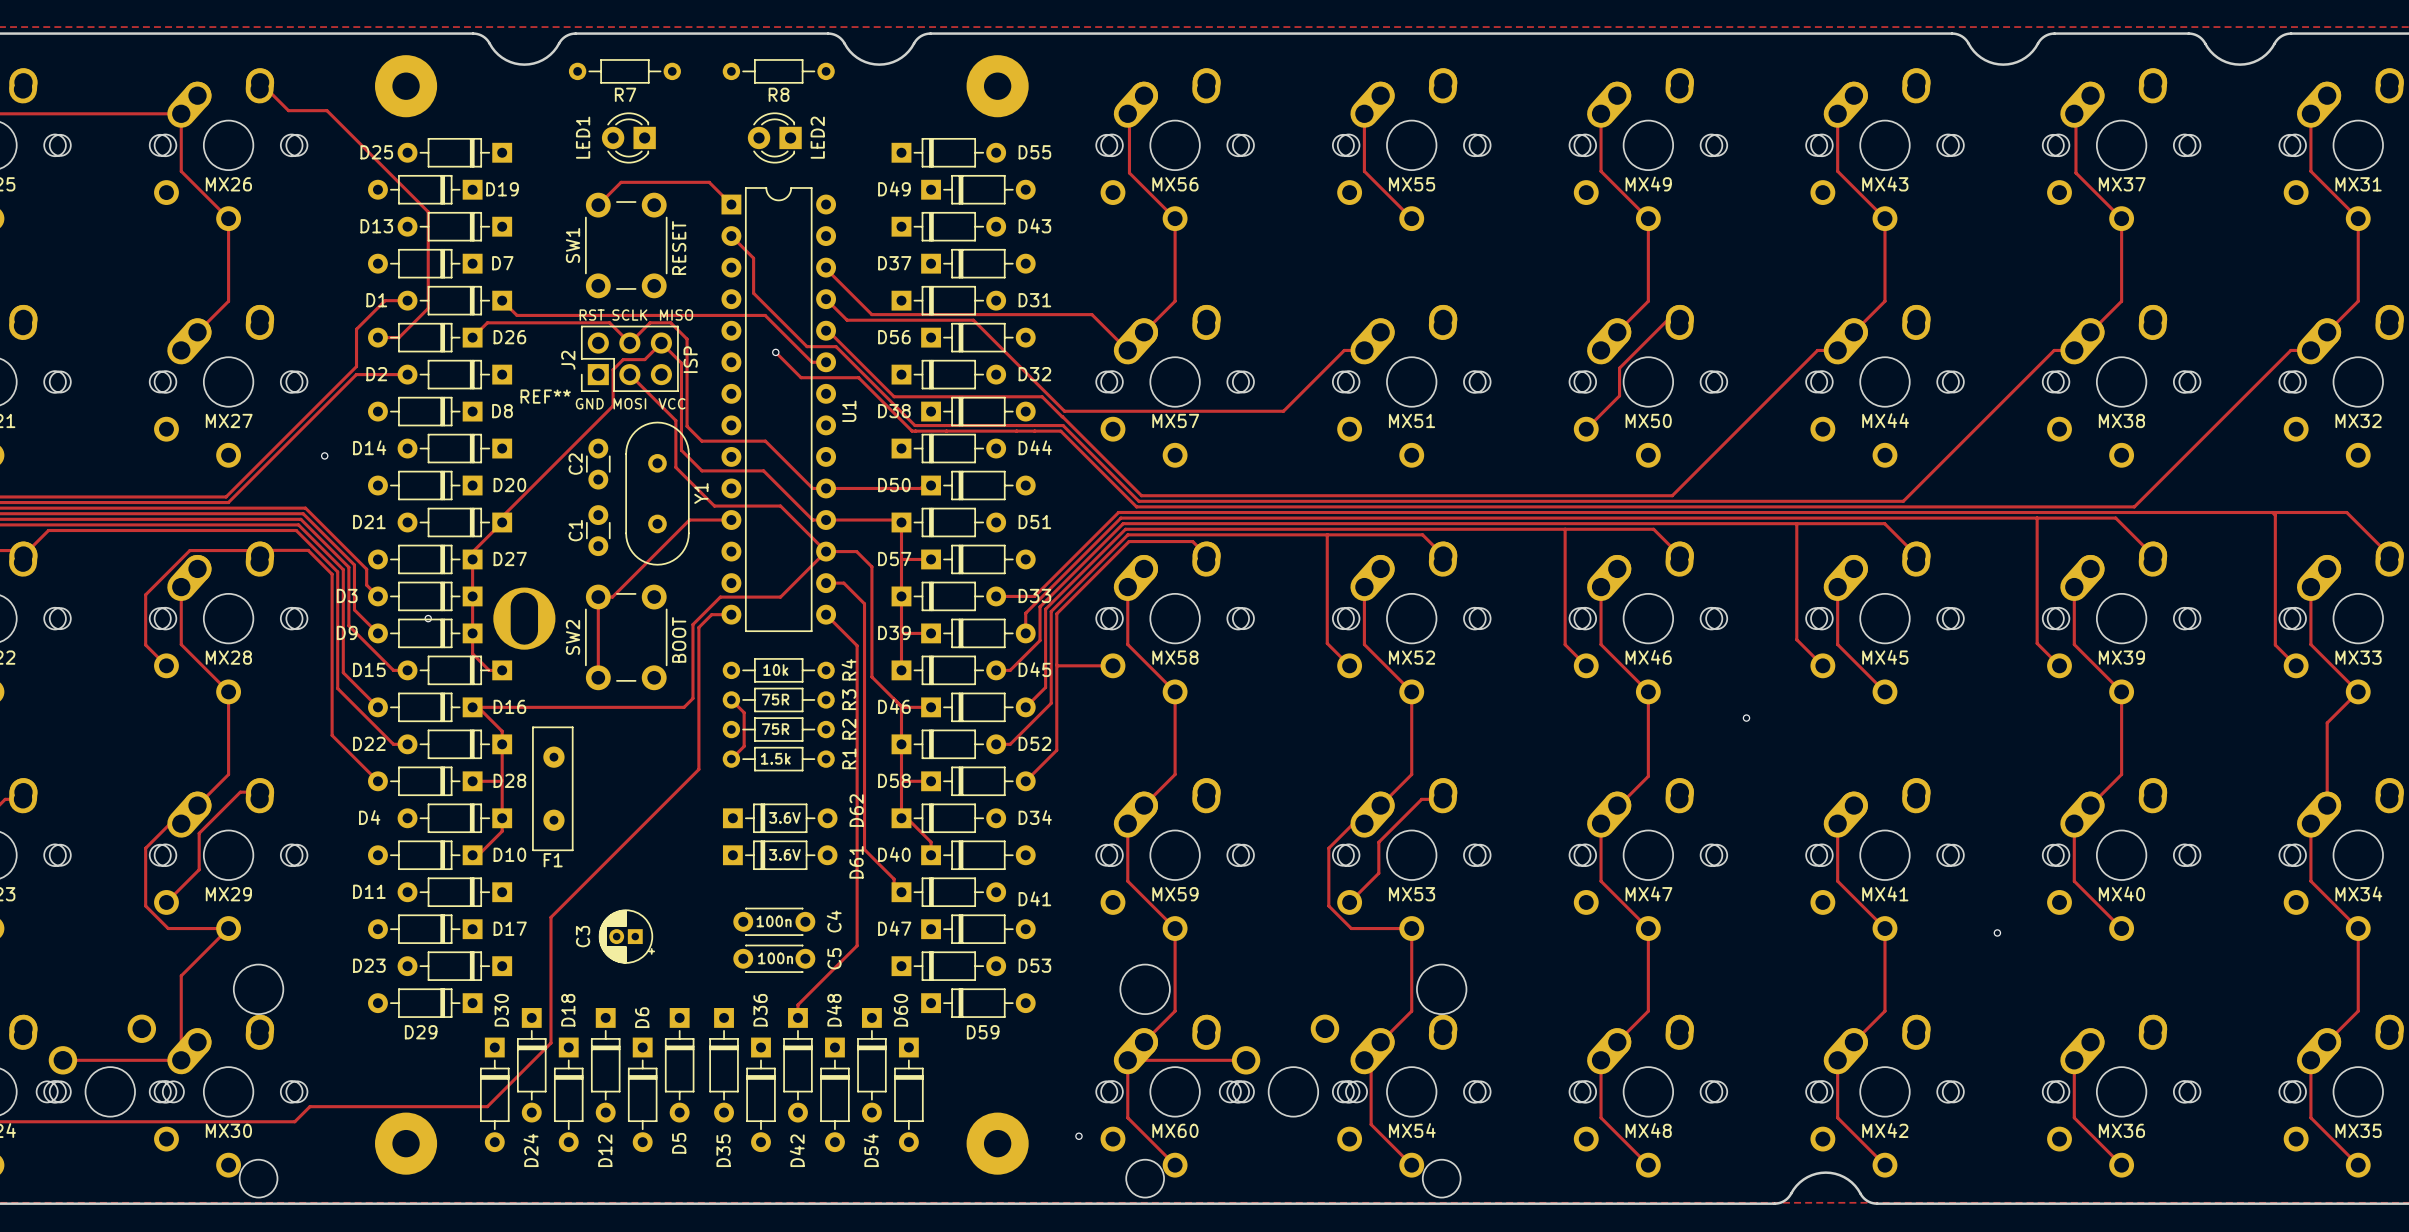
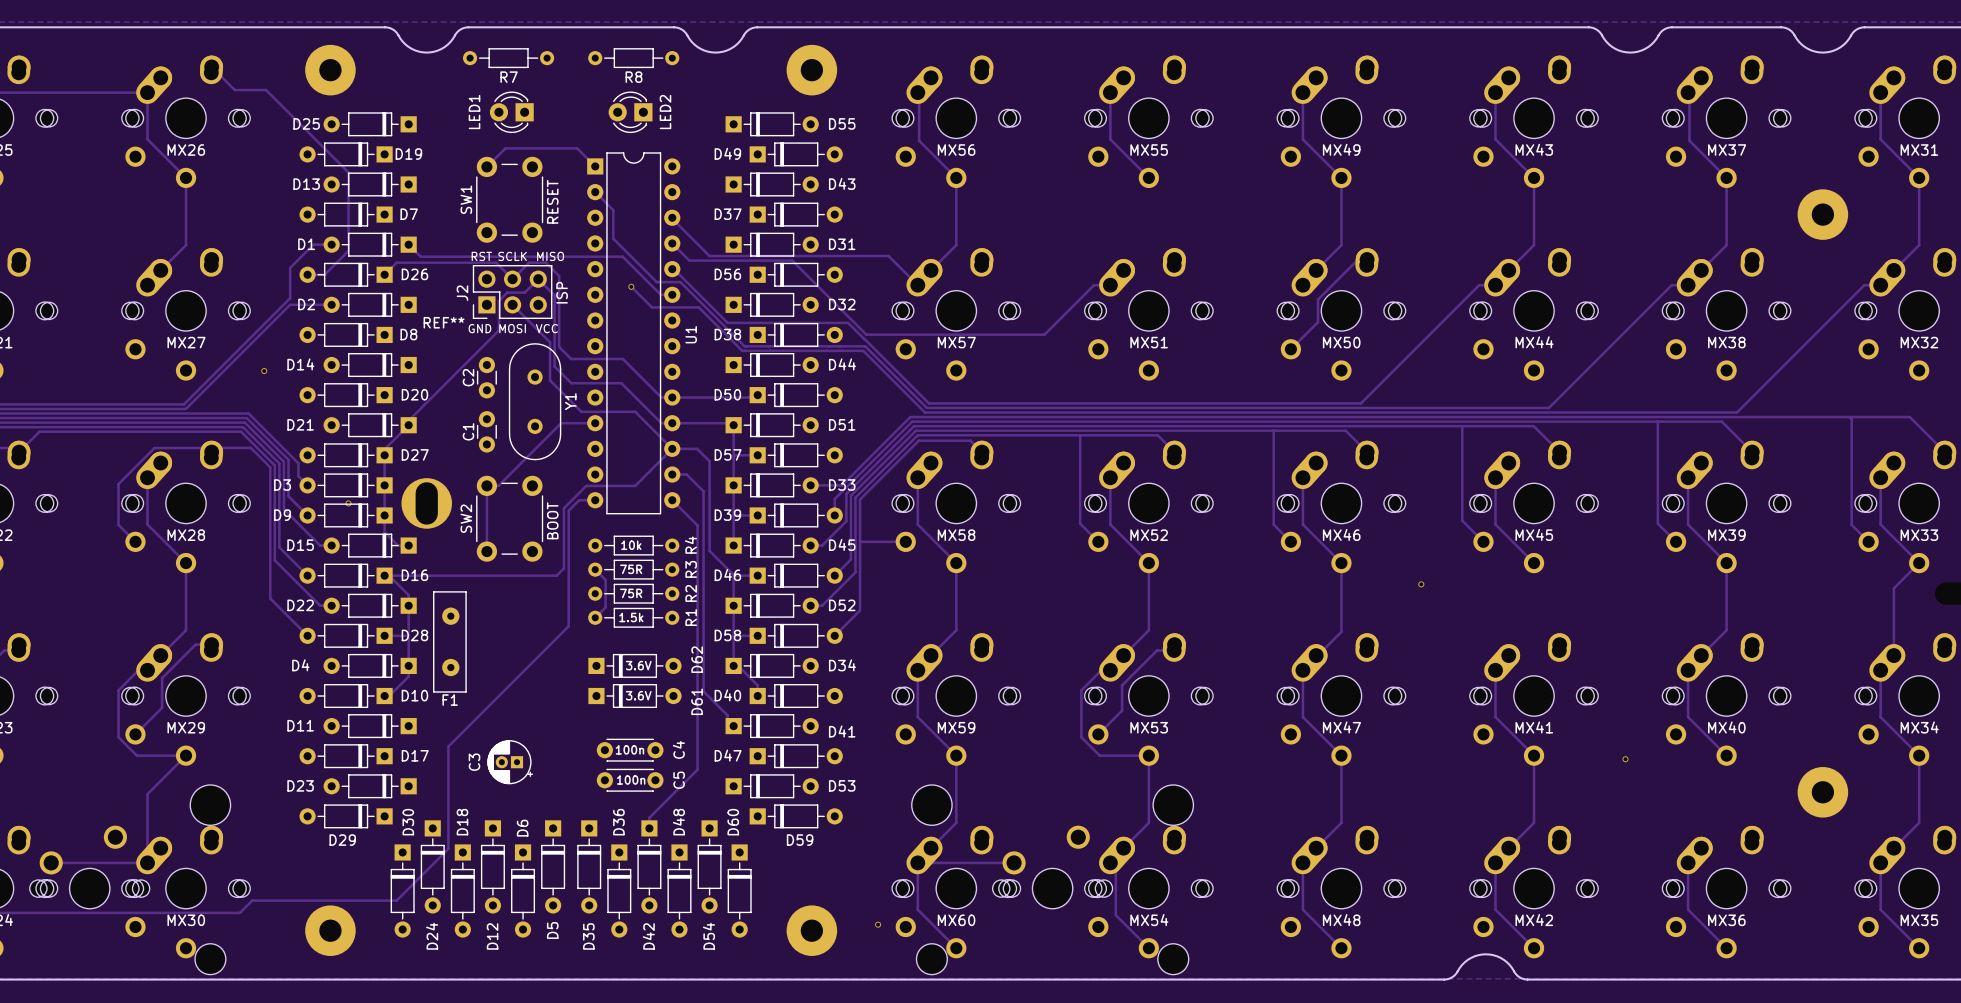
part: none -> (1822, 214)
part: none -> (1822, 792)

